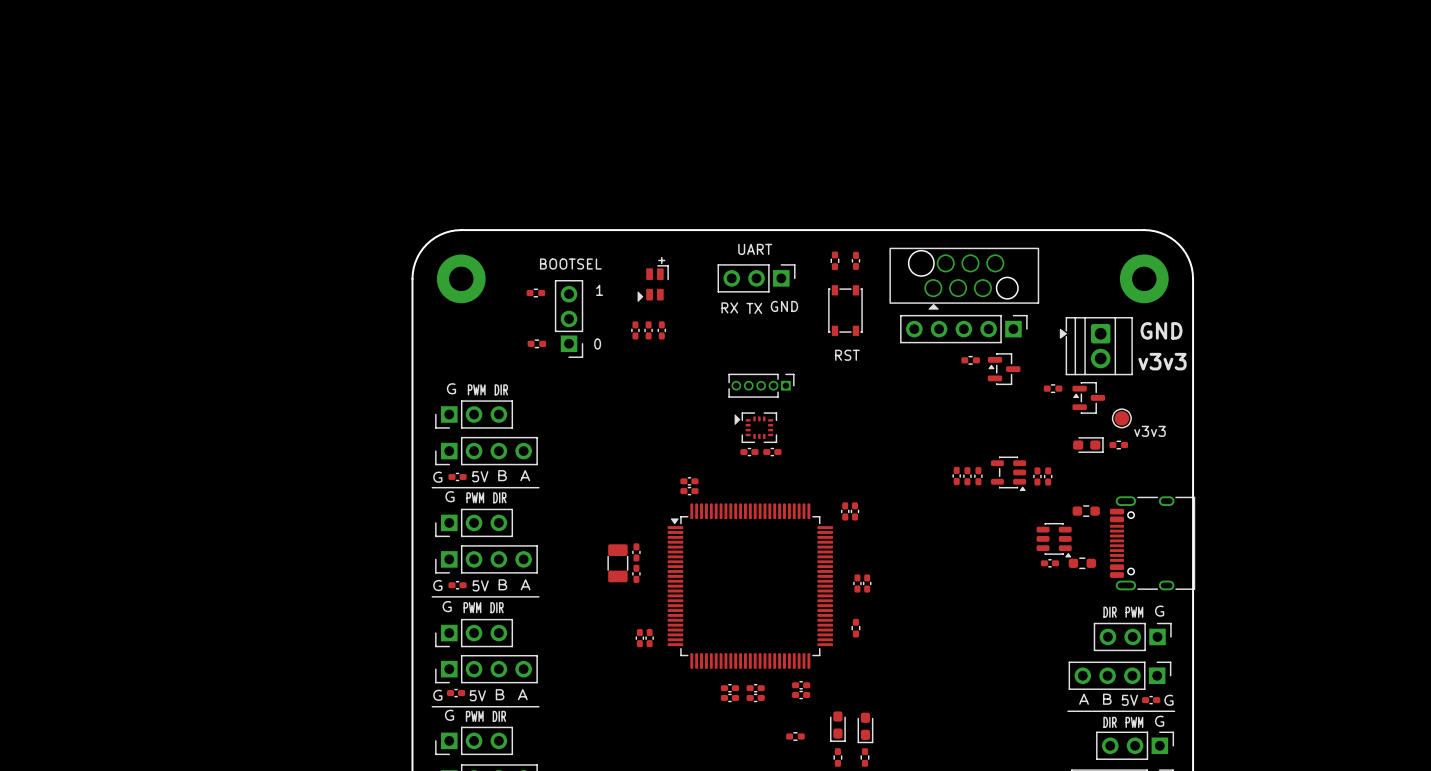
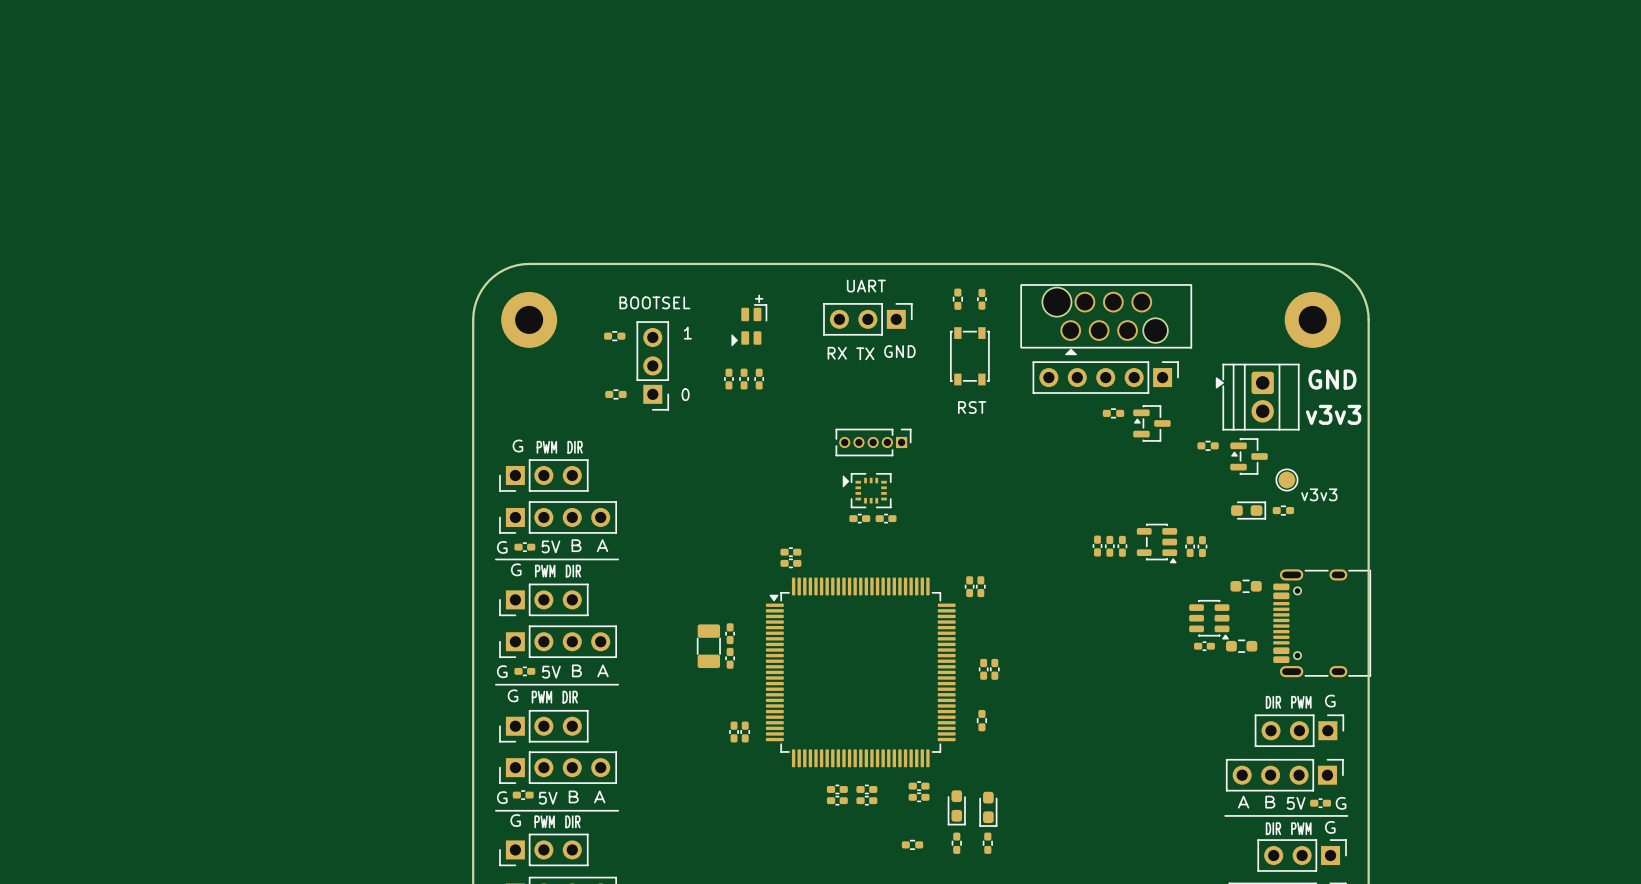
part: none -> (956, 807)
part: none -> (988, 809)
part footprint: [830, 711, 846, 742] -> [951, 832, 962, 854]
part footprint: [857, 712, 874, 744] -> [982, 832, 993, 854]
part: (837, 757) -> none
part: (864, 757) -> none

